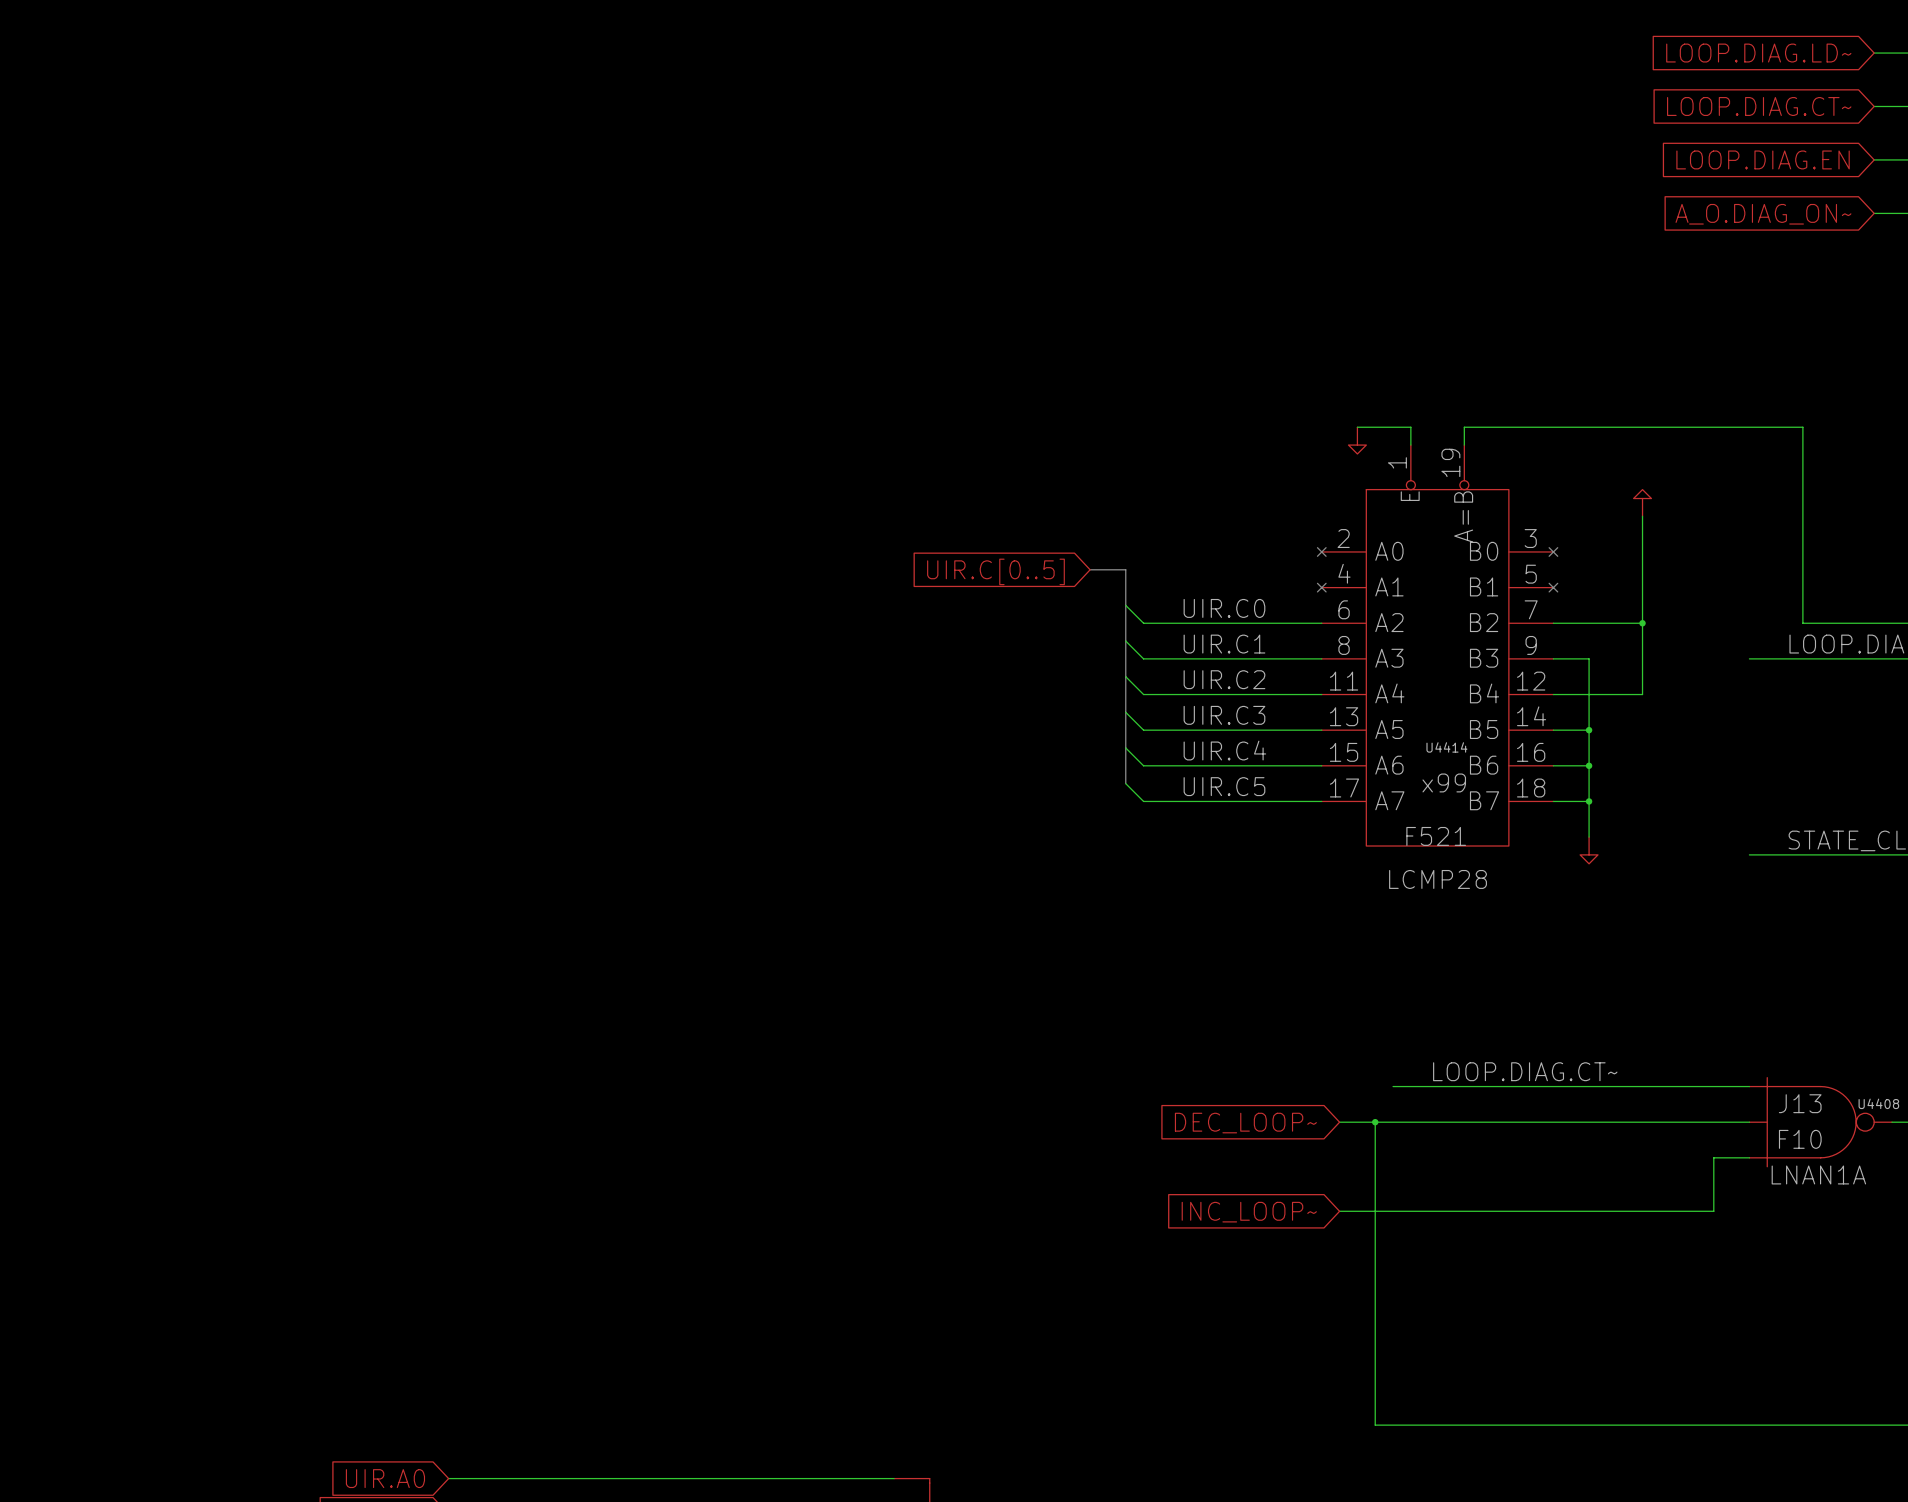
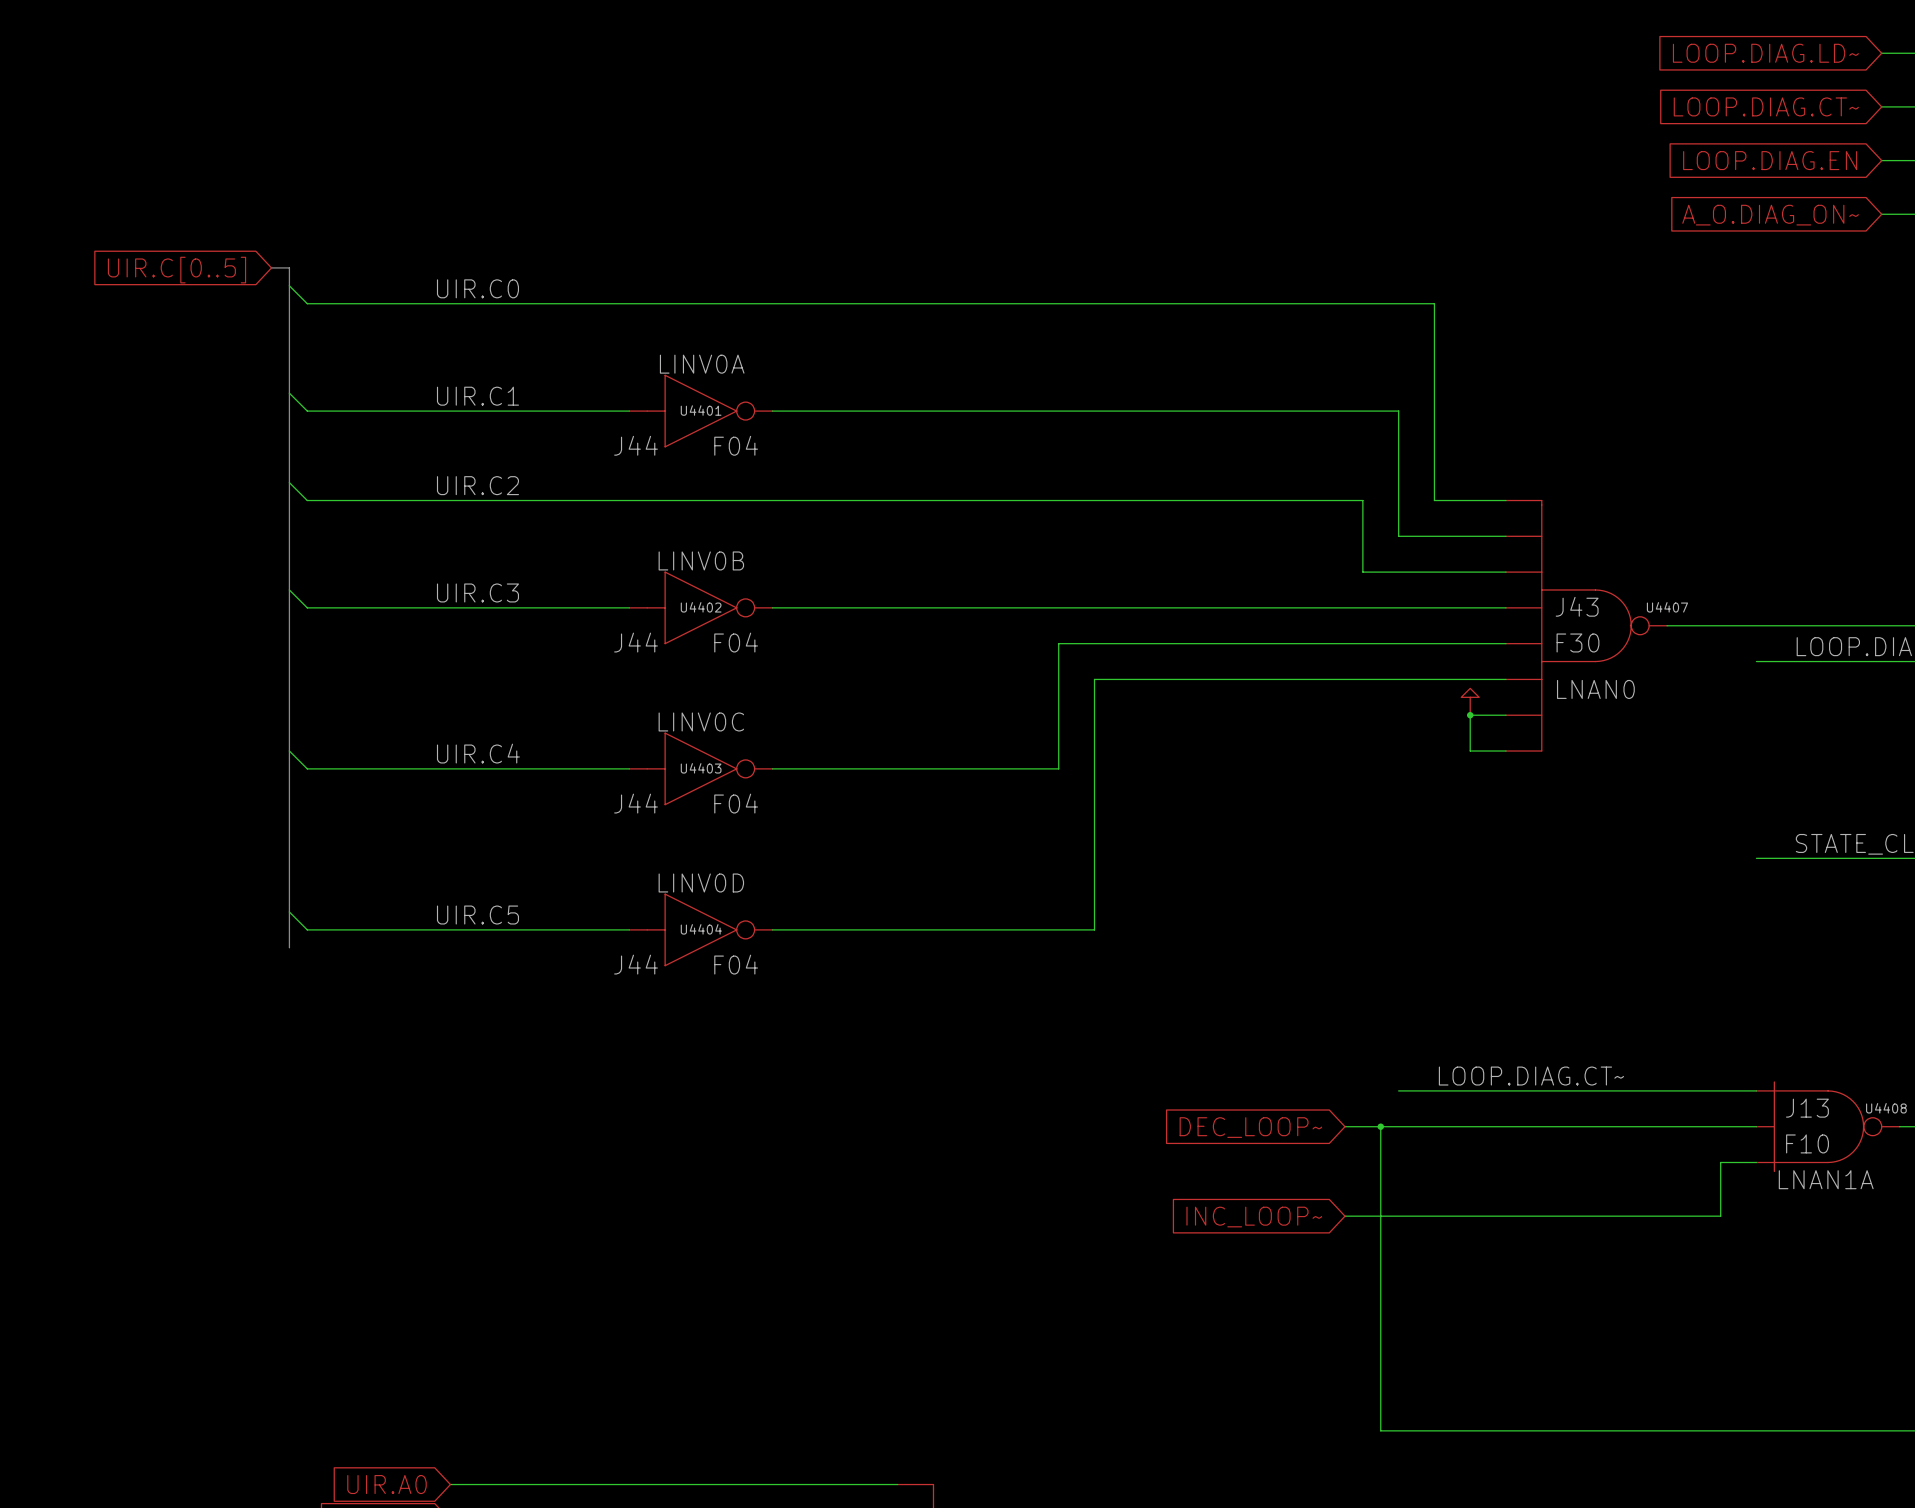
bus: none -> (271, 267) (289, 267) (289, 947)
global label: none -> UIR.C[0..5] (176, 270)
wire: none -> (289, 285) (307, 303) (1434, 303) (1434, 500) (1506, 500)
label: none -> UIR.C0 (477, 288)
wire: none -> (289, 393) (307, 411) (629, 411)
label: none -> UIR.C1 (477, 396)
U4401: none -> F04 (700, 411)
wire: none -> (772, 411) (1398, 411) (1398, 536) (1506, 536)
wire: (1357, 427) (1410, 427) (1410, 445) -> none
power symbol: (1357, 440) -> none
wire: (1464, 445) (1464, 427) (1802, 427) (1802, 623) -> (1667, 625) (1810, 625)
wire: none -> (289, 482) (307, 500) (1362, 500) (1362, 572) (1506, 572)
label: none -> UIR.C2 (477, 485)
power symbol: (1642, 502) -> none
wire: (1642, 516) (1642, 694) (1553, 694) -> none
no-connect mark: (1321, 551) -> none
no-connect mark: (1553, 551) -> none
bus: (1090, 569) (1125, 569) (1125, 783) -> none
global label: UIR.C[0..5] (995, 571) -> none
wire: none -> (289, 589) (307, 607) (629, 607)
no-connect mark: (1321, 587) -> none
no-connect mark: (1553, 587) -> none
label: none -> UIR.C3 (477, 592)
U4402: none -> F04 (700, 607)
wire: none -> (772, 607) (1506, 607)
wire: (1125, 605) (1143, 623) (1321, 623) -> none
label: UIR.C0 (1224, 608) -> none
wire: (1553, 623) (1642, 623) -> none
U4407: none -> F30 (1586, 625)
junction: (1642, 623) -> none
wire: (1125, 641) (1143, 658) (1321, 658) -> none
wire: none -> (1506, 643) (1058, 643) (1058, 768) (772, 768)
label: UIR.C1 (1224, 644) -> none
U4414: F521 (1437, 645) -> none
wire: (1553, 658) (1589, 658) (1589, 837) -> none
wire: (1125, 676) (1143, 694) (1321, 694) -> none
wire: none -> (1506, 679) (1094, 679) (1094, 929) (772, 929)
label: UIR.C2 (1224, 679) -> none
power symbol: none -> (1470, 701)
wire: (1125, 712) (1143, 730) (1321, 730) -> none
junction: none -> (1470, 715)
wire: none -> (1506, 715) (1470, 715) (1470, 751) (1506, 751)
label: UIR.C3 (1224, 715) -> none
wire: (1553, 730) (1589, 730) -> none
junction: (1589, 730) -> none
wire: none -> (289, 751) (307, 768) (629, 768)
wire: (1125, 747) (1143, 765) (1321, 765) -> none
label: none -> UIR.C4 (478, 753)
label: UIR.C4 (1224, 750) -> none
U4403: none -> F04 (700, 768)
wire: (1553, 765) (1589, 765) -> none
junction: (1589, 765) -> none
wire: (1125, 783) (1143, 801) (1321, 801) -> none
label: UIR.C5 (1224, 786) -> none
wire: (1553, 801) (1589, 801) -> none
junction: (1589, 801) -> none
power symbol: (1589, 850) -> none
wire: none -> (289, 912) (307, 929) (629, 929)
label: none -> UIR.C5 (477, 915)
U4404: none -> F04 (700, 929)

